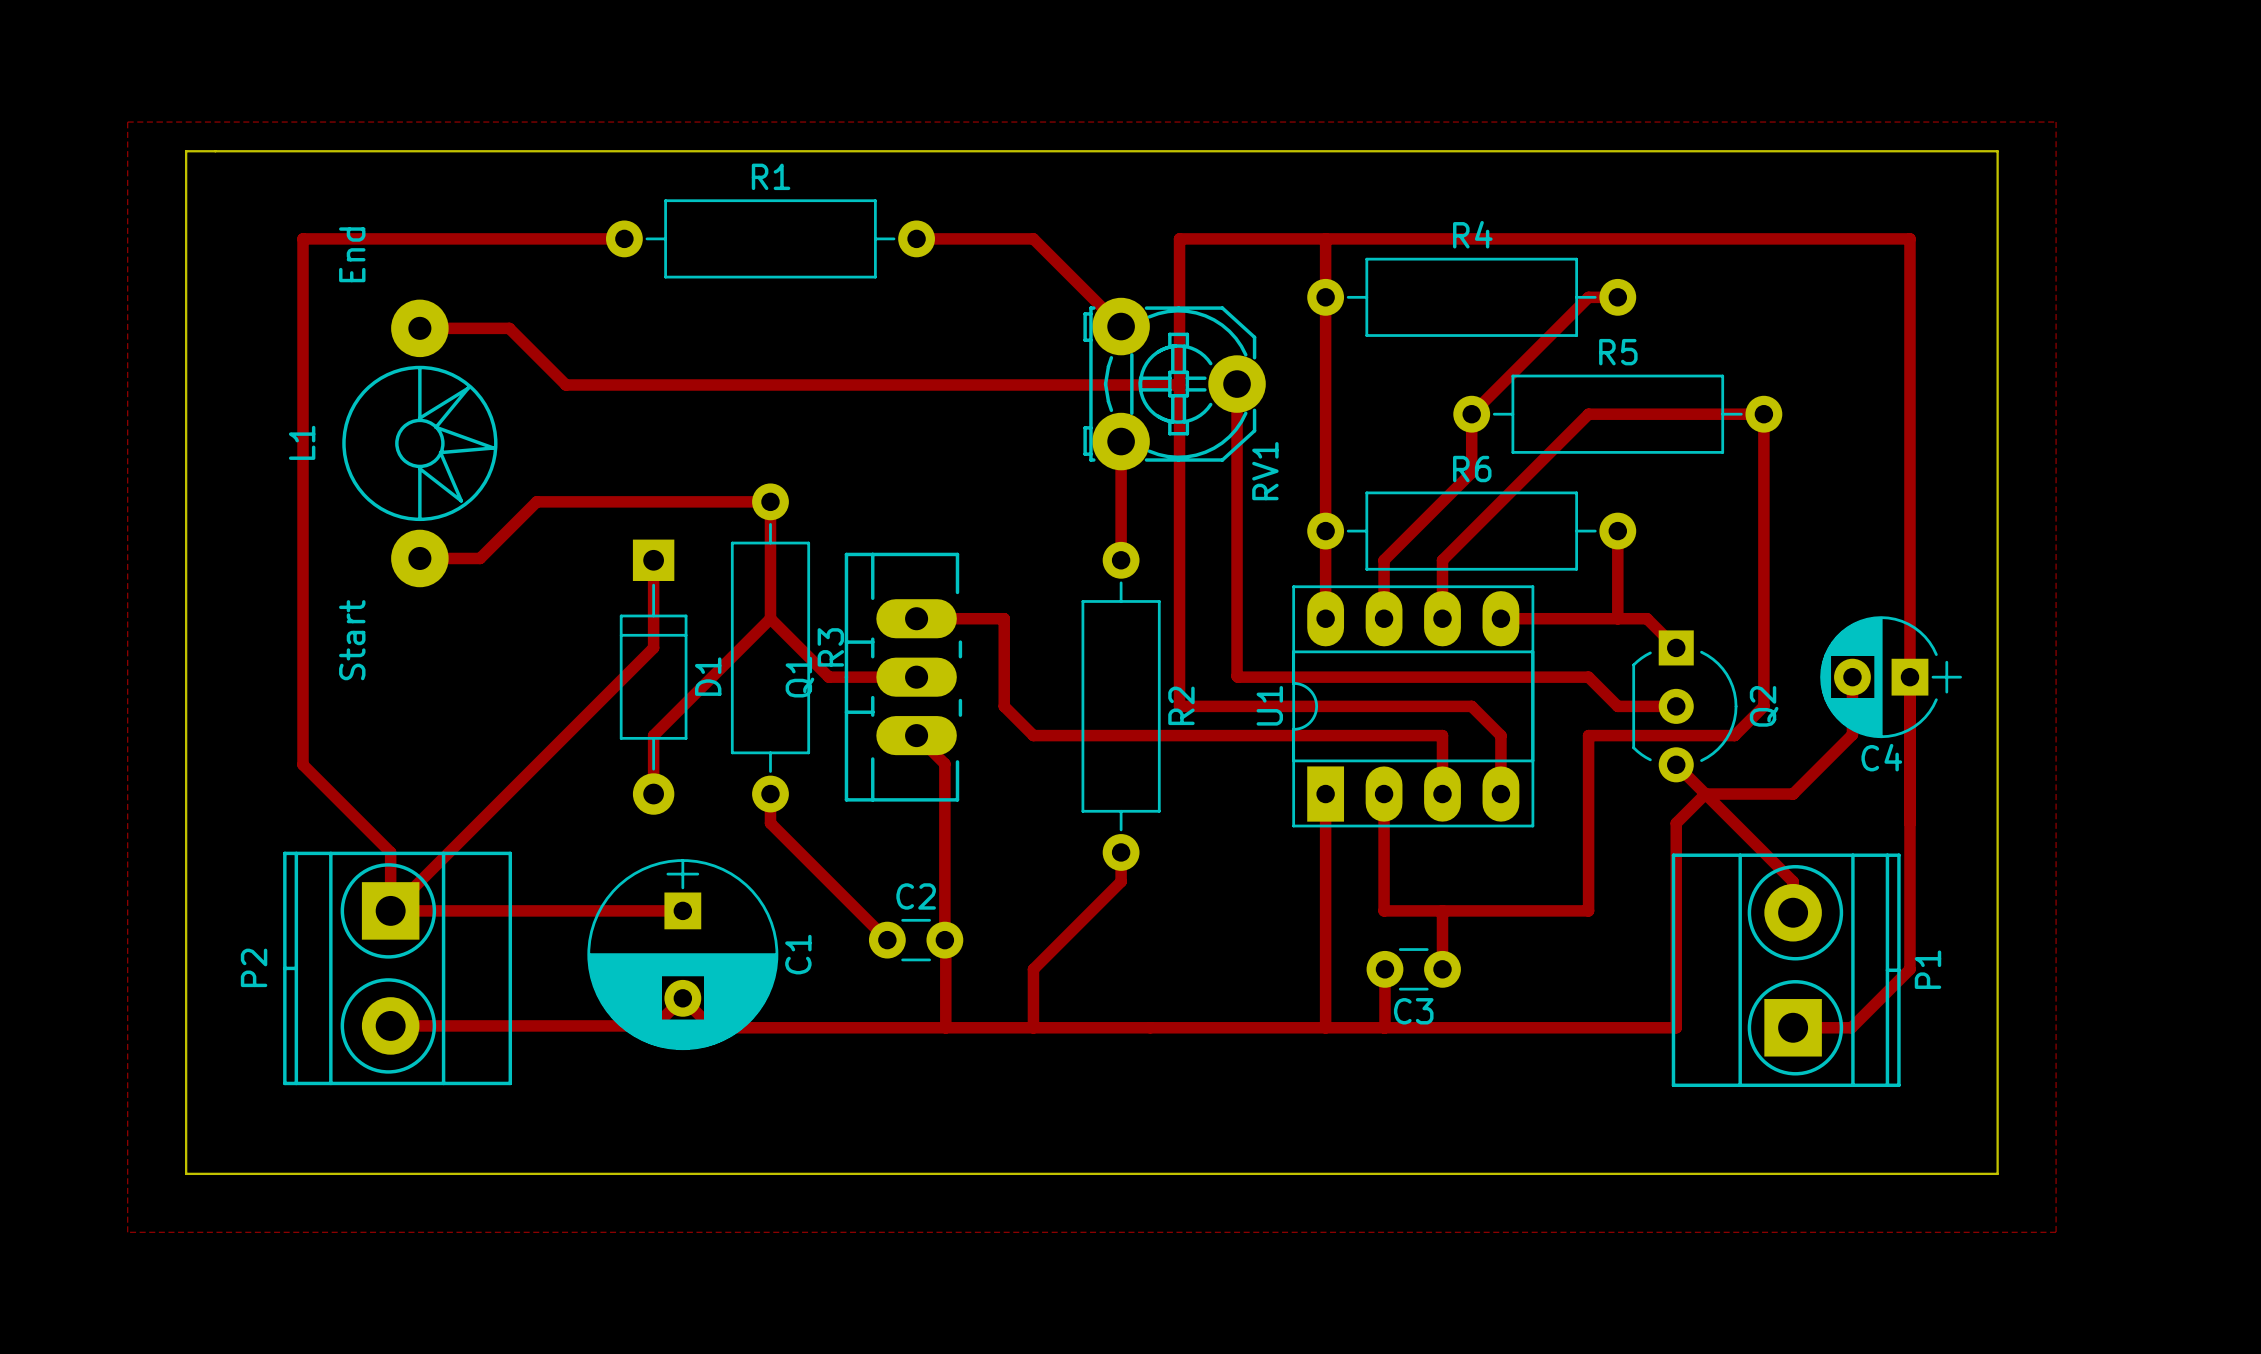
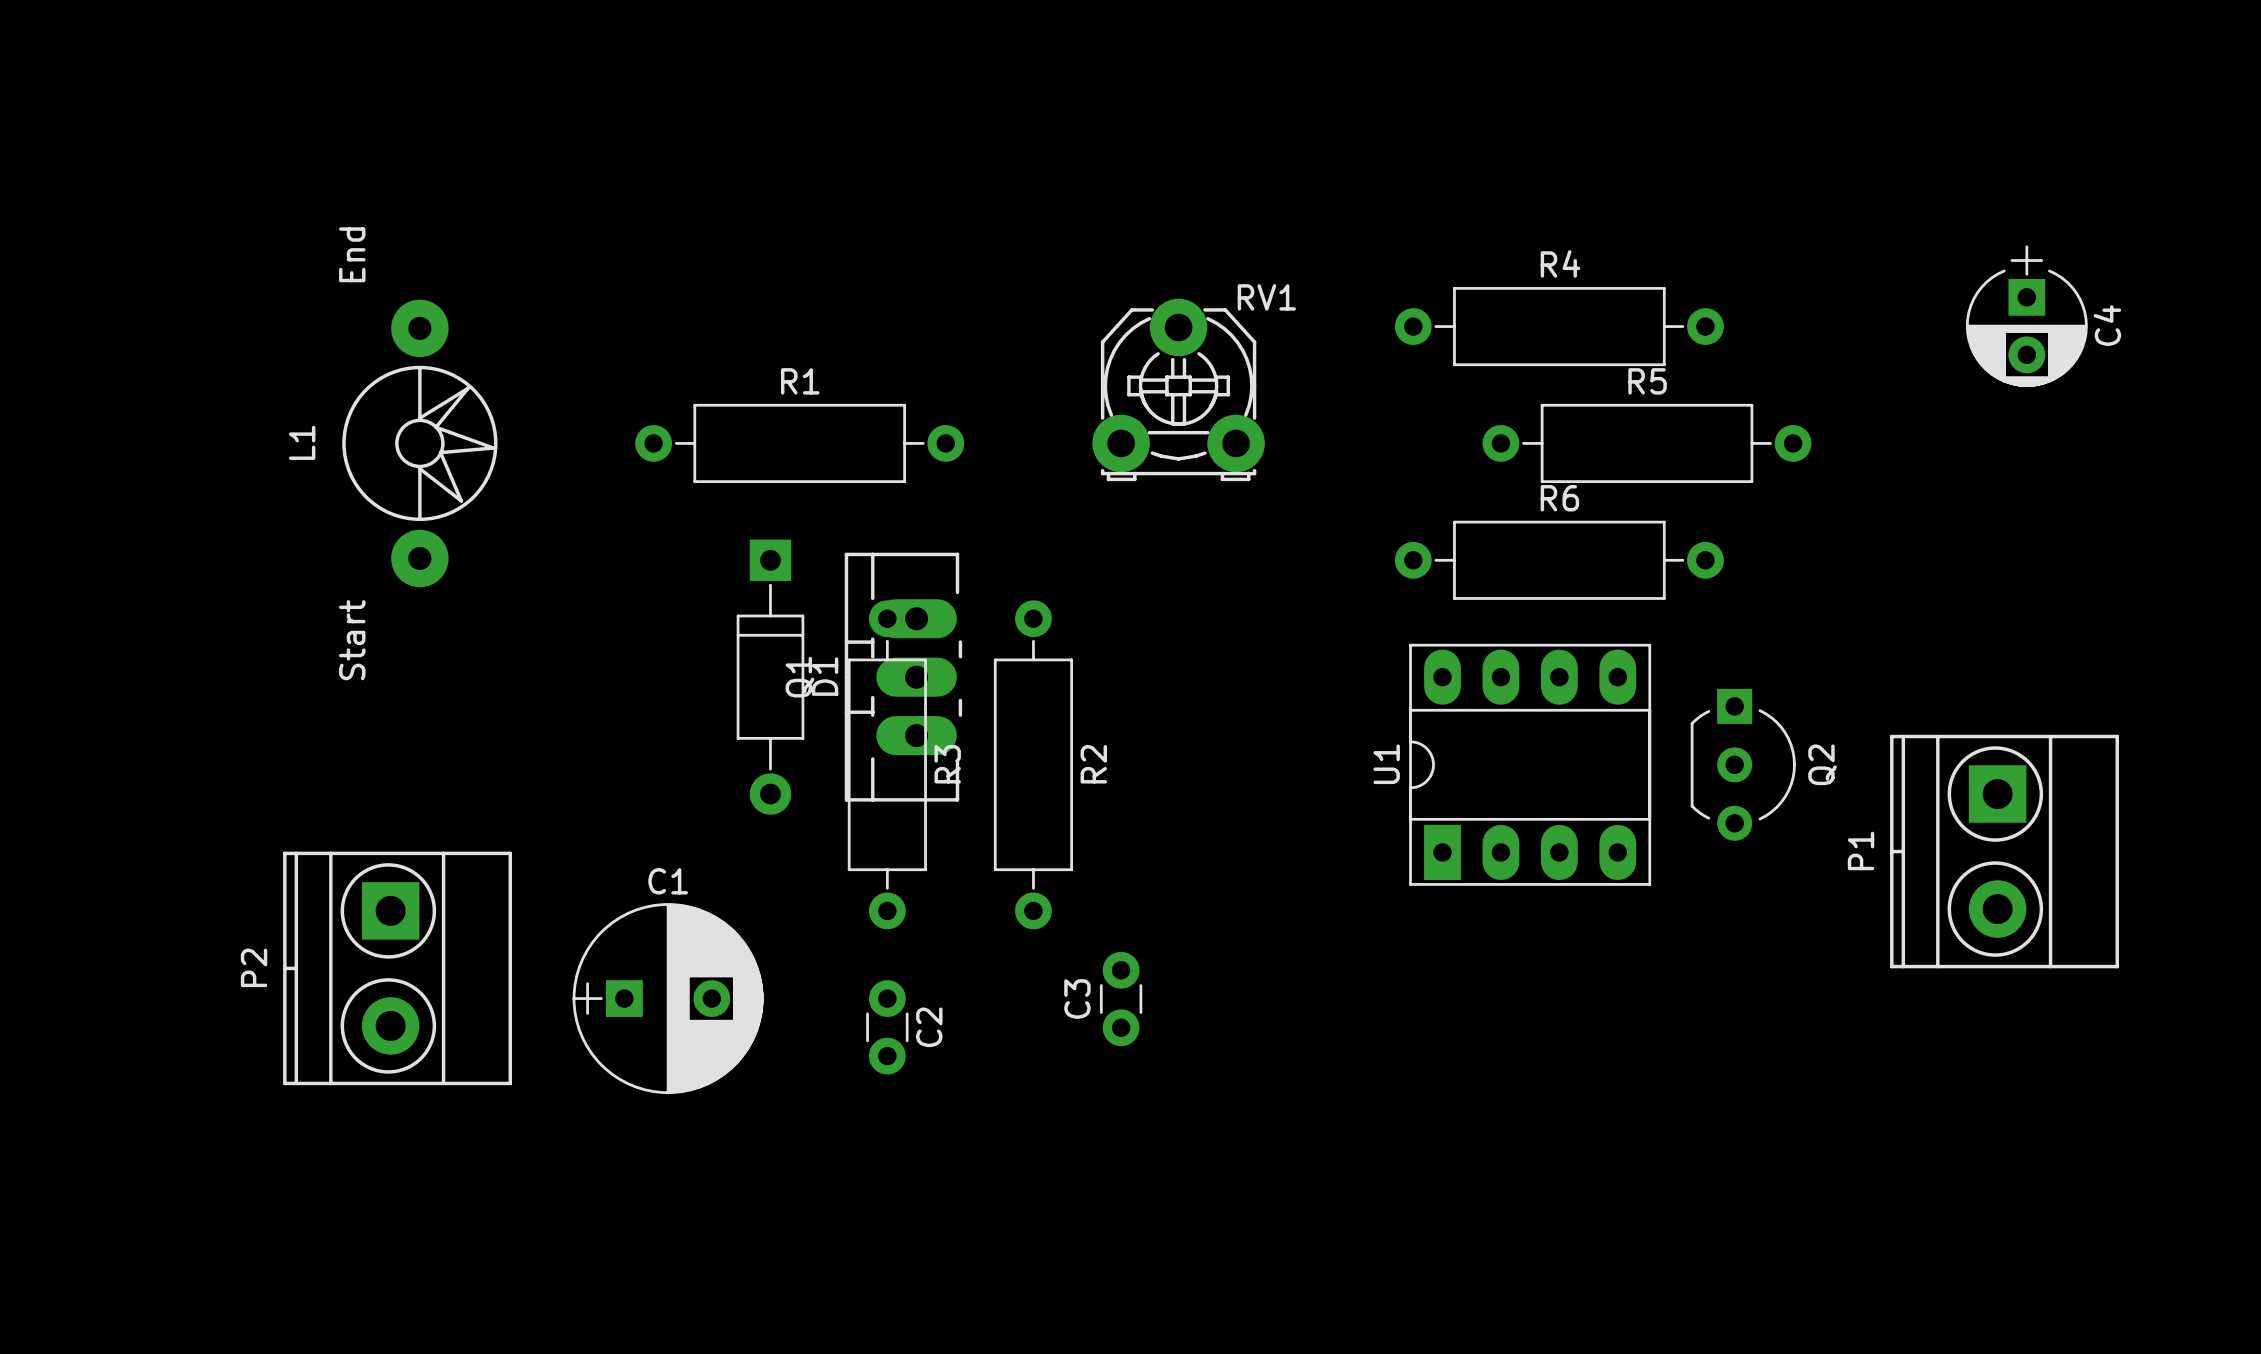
top zone outline: (127, 122) (2056, 122) (2056, 1232) (127, 1232) (127, 122) -> none
board edge: (186, 151) (186, 1173) (1997, 1173) (1997, 151) (186, 151) -> none
top track: (624, 238) (303, 238) (303, 764) (390, 852) (390, 910) -> none
R1 position: (770, 238) -> (799, 443)
top track: (916, 238) (1033, 238) (1121, 326) -> none
top track: (1325, 238) (1325, 618) -> none
R4 position: (1471, 297) -> (1559, 326)
top track: (1617, 297) (1588, 297) (1471, 414) (1471, 472) (1384, 560) (1384, 618) -> none
top track: (419, 328) (509, 328) (565, 384) (1179, 384) -> none
RV1 rotation: 0° (1174, 384) -> 90° counterclockwise (1178, 389)
top track: (1237, 384) (1237, 677) (1588, 677) (1617, 706) (1676, 706) -> none
R5 position: (1617, 414) -> (1647, 443)
top track: (1121, 441) (1121, 560) -> none
R6 position: (1471, 531) -> (1559, 560)
top track: (1617, 531) (1617, 618) -> none
top track: (419, 558) (480, 558) (536, 501) (770, 501) (770, 618) -> none
top track: (653, 560) (653, 647) (390, 910) -> none
top track: (770, 618) (653, 735) (653, 794) -> none
top track: (770, 618) (828, 677) (916, 677) -> none
top track: (916, 618) (1004, 618) (1004, 706) (1033, 735) (1442, 735) (1442, 794) -> none
top track: (1442, 618) (1442, 560) (1588, 414) (1763, 414) (1763, 706) (1734, 735) (1588, 735) (1588, 910) (1384, 910) (1384, 794) -> none
top track: (1500, 618) (1647, 618) (1676, 647) -> none
R3 position: (770, 647) -> (887, 764)
D1 position: (653, 677) -> (770, 677)
top track: (1852, 677) (1852, 734) (1793, 794) (1705, 794) (1676, 823) (1676, 1027) (712, 1027) (682, 998) -> none
C4 rotation: 0° (1891, 677) -> 90° counterclockwise (2026, 316)
C4 position: (1891, 677) -> (2026, 316)
R2 position: (1121, 706) -> (1033, 764)
U1 position: (1413, 706) -> (1530, 764)
Q2 position: (1684, 706) -> (1743, 764)
top track: (916, 735) (944, 763) (945, 1027) -> none
top track: (1676, 764) (1793, 881) (1793, 912) -> none
top track: (770, 794) (770, 823) (887, 940) -> none
top track: (1325, 794) (1325, 1027) -> none
top track: (1500, 794) (1500, 735) (1471, 706) (1179, 706) (1179, 238) (1909, 238) (1909, 969) (1851, 1027) (1793, 1027) -> none
top track: (1121, 852) (1121, 881) (1033, 969) (1033, 1027) -> none
top track: (390, 910) (682, 910) -> none
top track: (1442, 910) (1442, 969) -> none
C2 rotation: 0° (916, 940) -> 90° clockwise (887, 1027)
C2 position: (916, 940) -> (887, 1027)
C1 rotation: 0° (682, 954) -> 90° counterclockwise (668, 998)
top track: (1384, 969) (1384, 1027) -> none
C3 rotation: 0° (1413, 969) -> 90° clockwise (1121, 999)
C3 position: (1413, 969) -> (1121, 999)
P1 rotation: 0° (1786, 970) -> 180° (2004, 851)
P1 position: (1786, 970) -> (2004, 851)
top track: (682, 998) (655, 1025) (390, 1025) -> none

